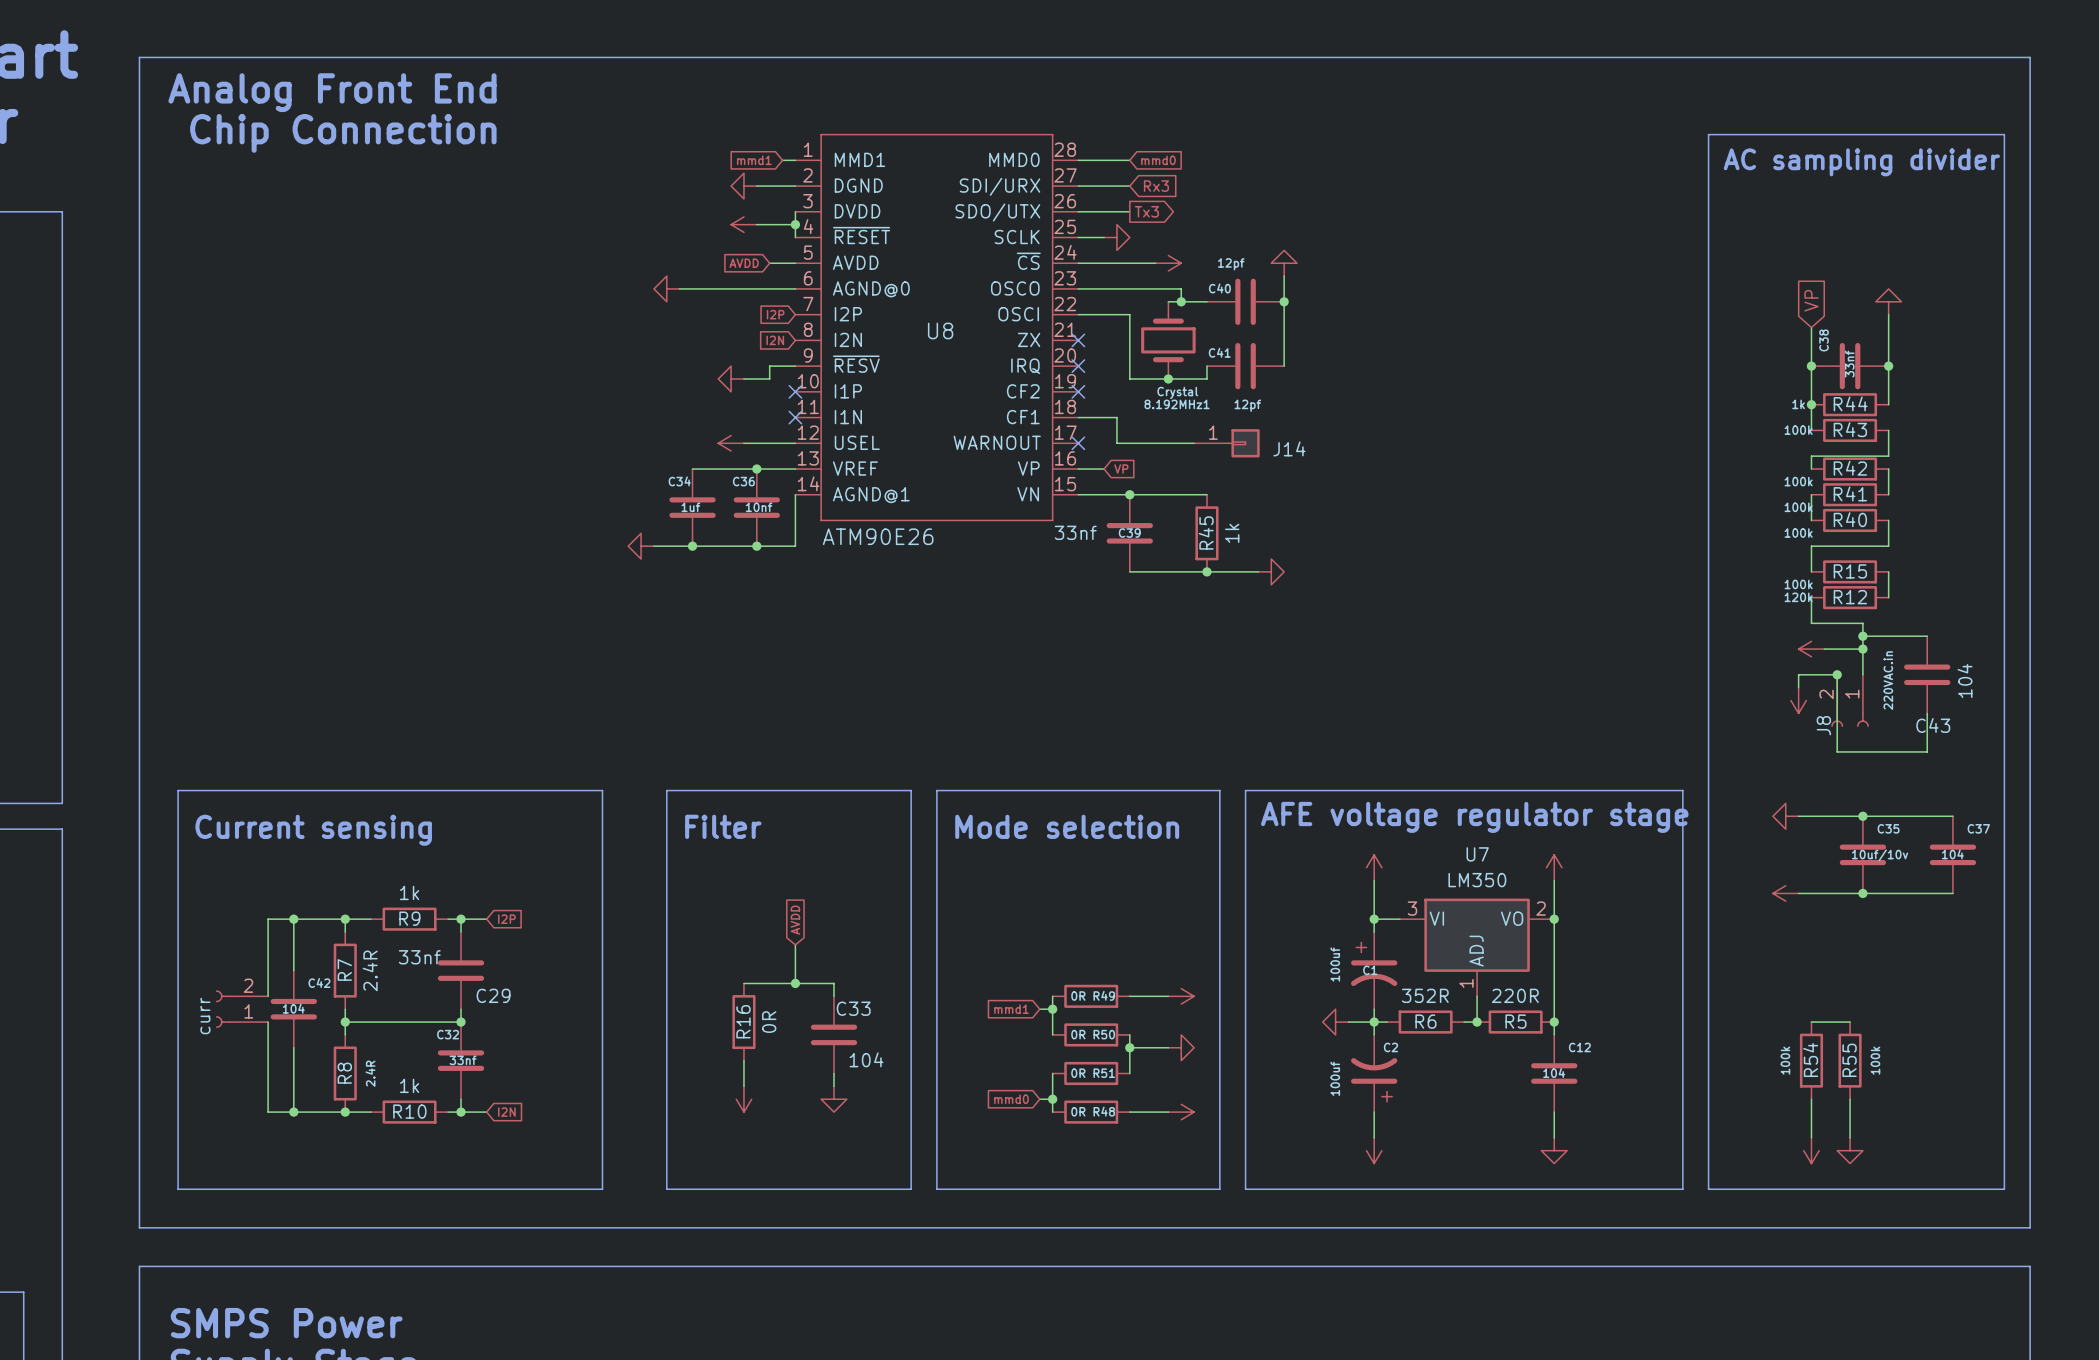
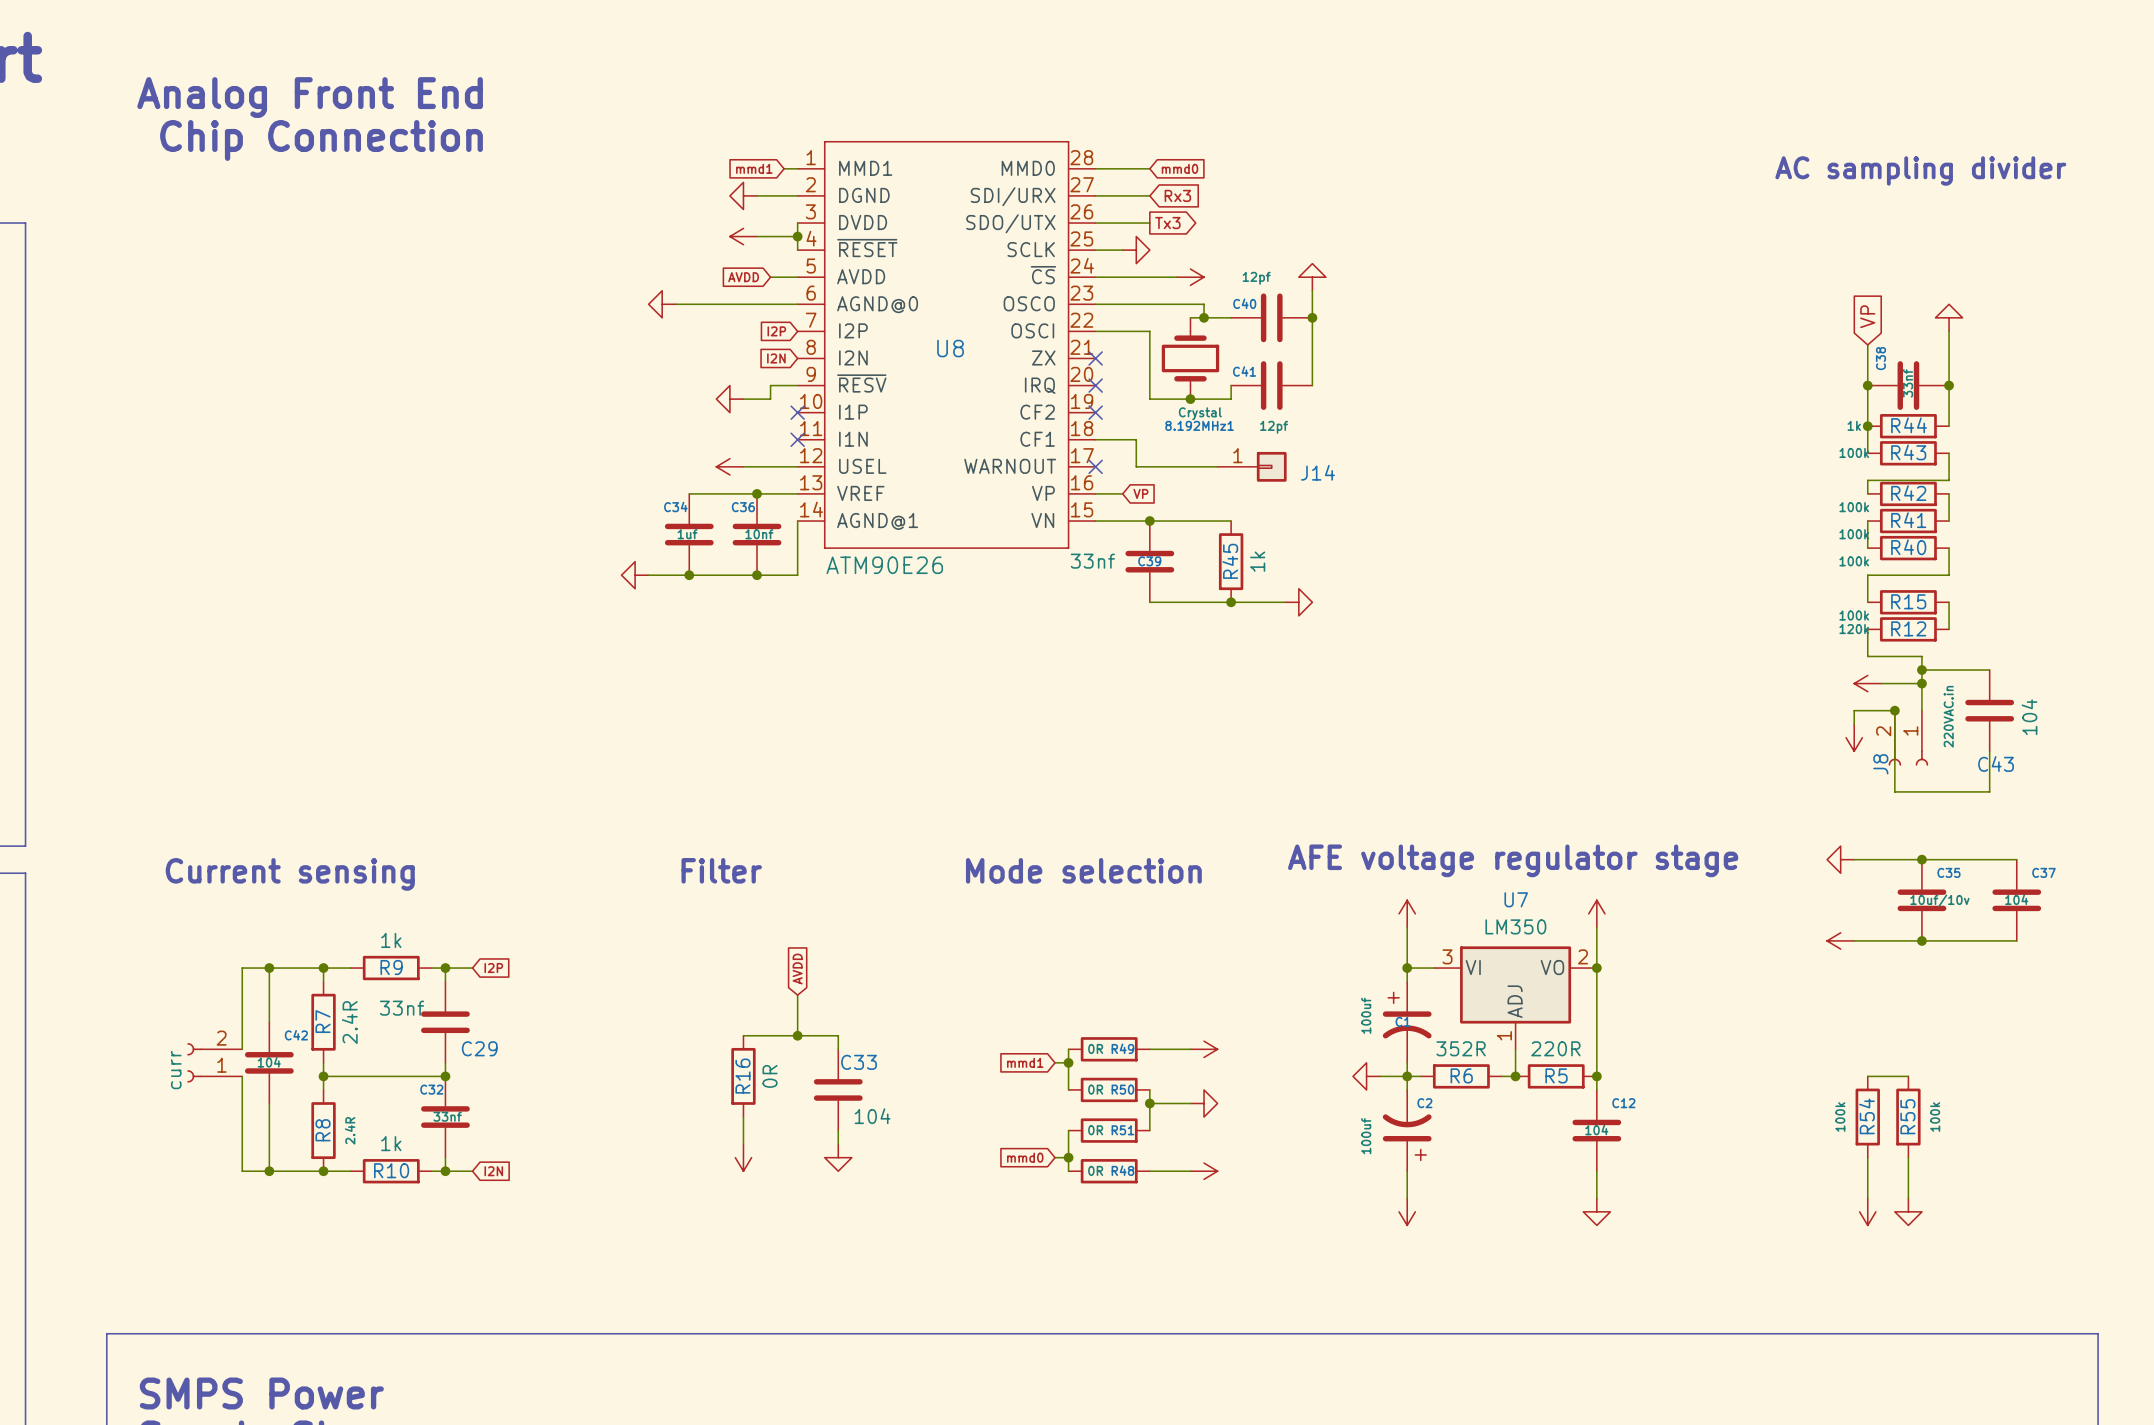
line: (139, 57) (2030, 57) (2030, 1227) (139, 1227) (139, 57) -> none
line: (1708, 134) (2004, 134) (2004, 1189) (1708, 1189) (1708, 134) -> none
line: (178, 790) (602, 790) (602, 1189) (178, 1189) (178, 790) -> none
line: (666, 790) (911, 790) (911, 1189) (666, 1189) (666, 790) -> none
line: (936, 790) (1219, 790) (1219, 1189) (936, 1189) (936, 790) -> none
line: (1245, 790) (1682, 790) (1682, 1189) (1245, 1189) (1245, 790) -> none

